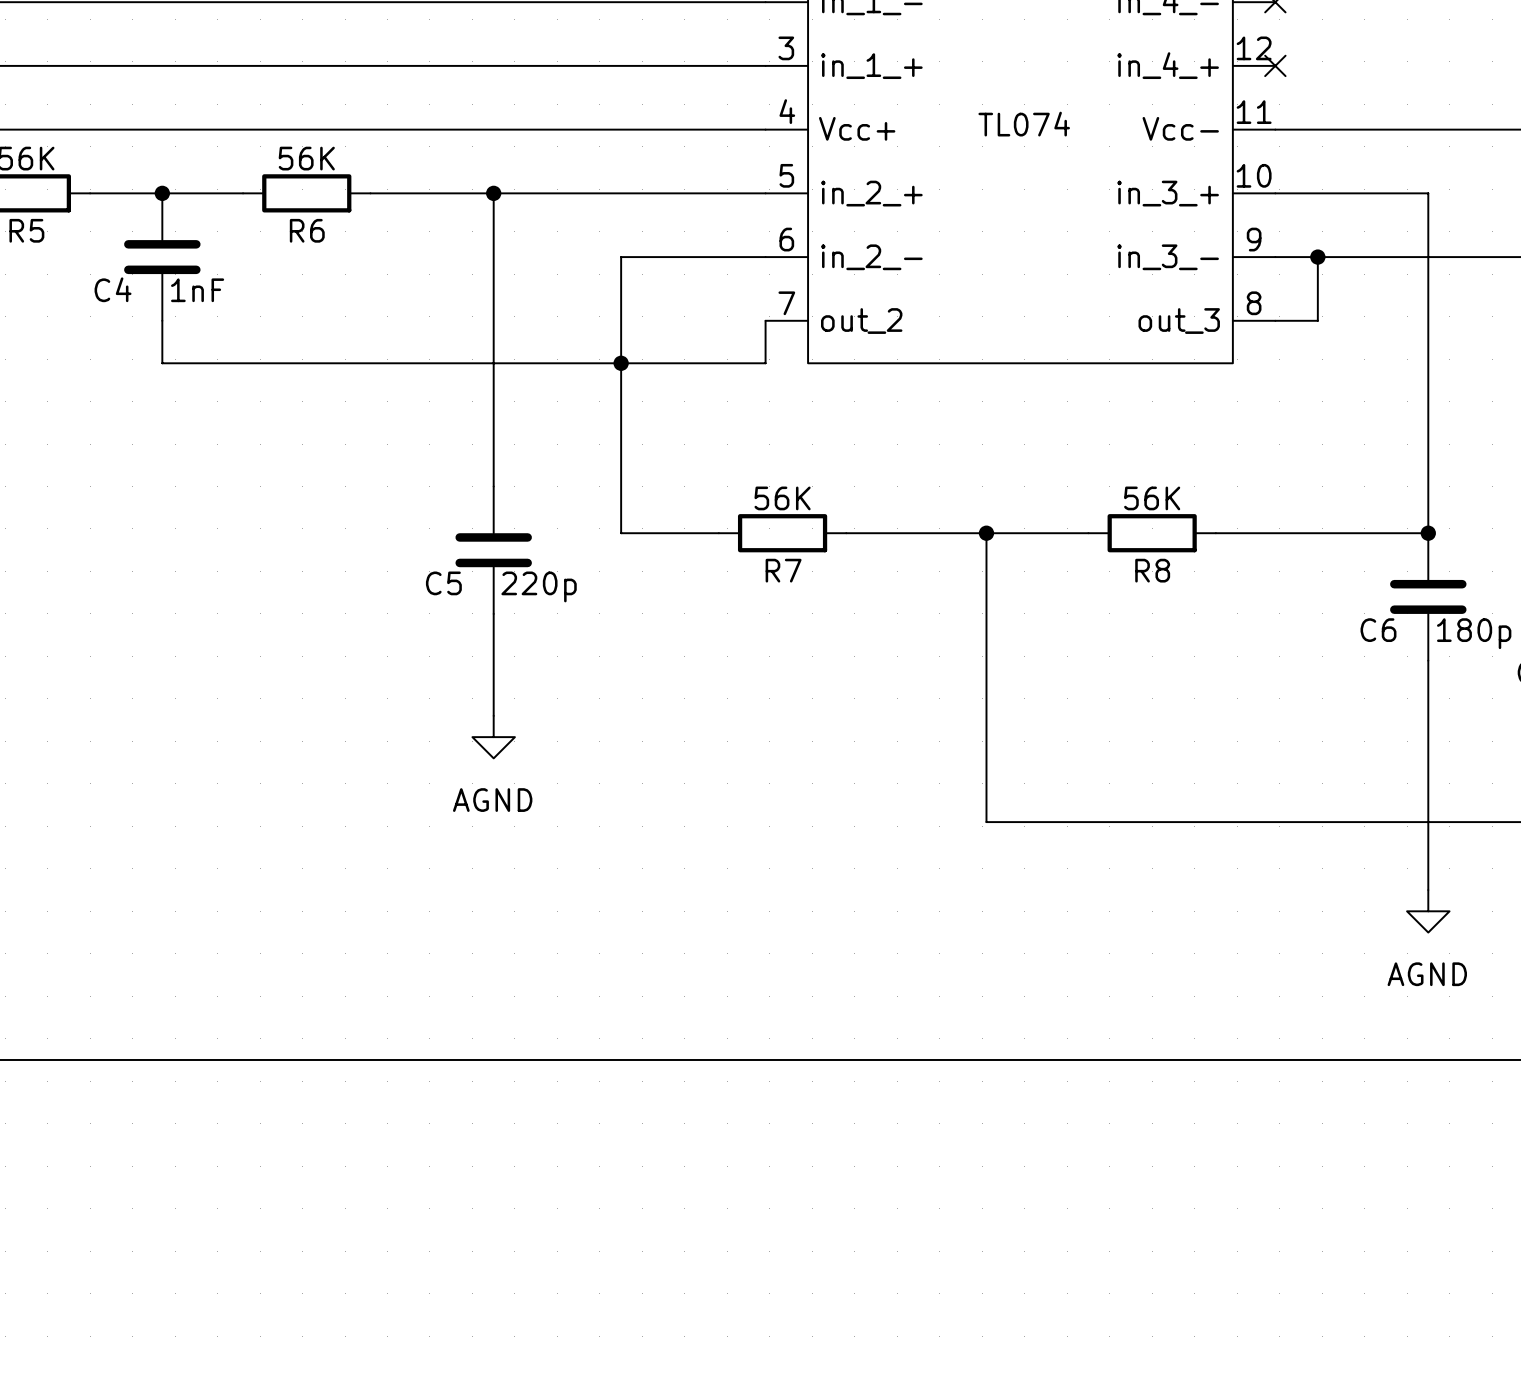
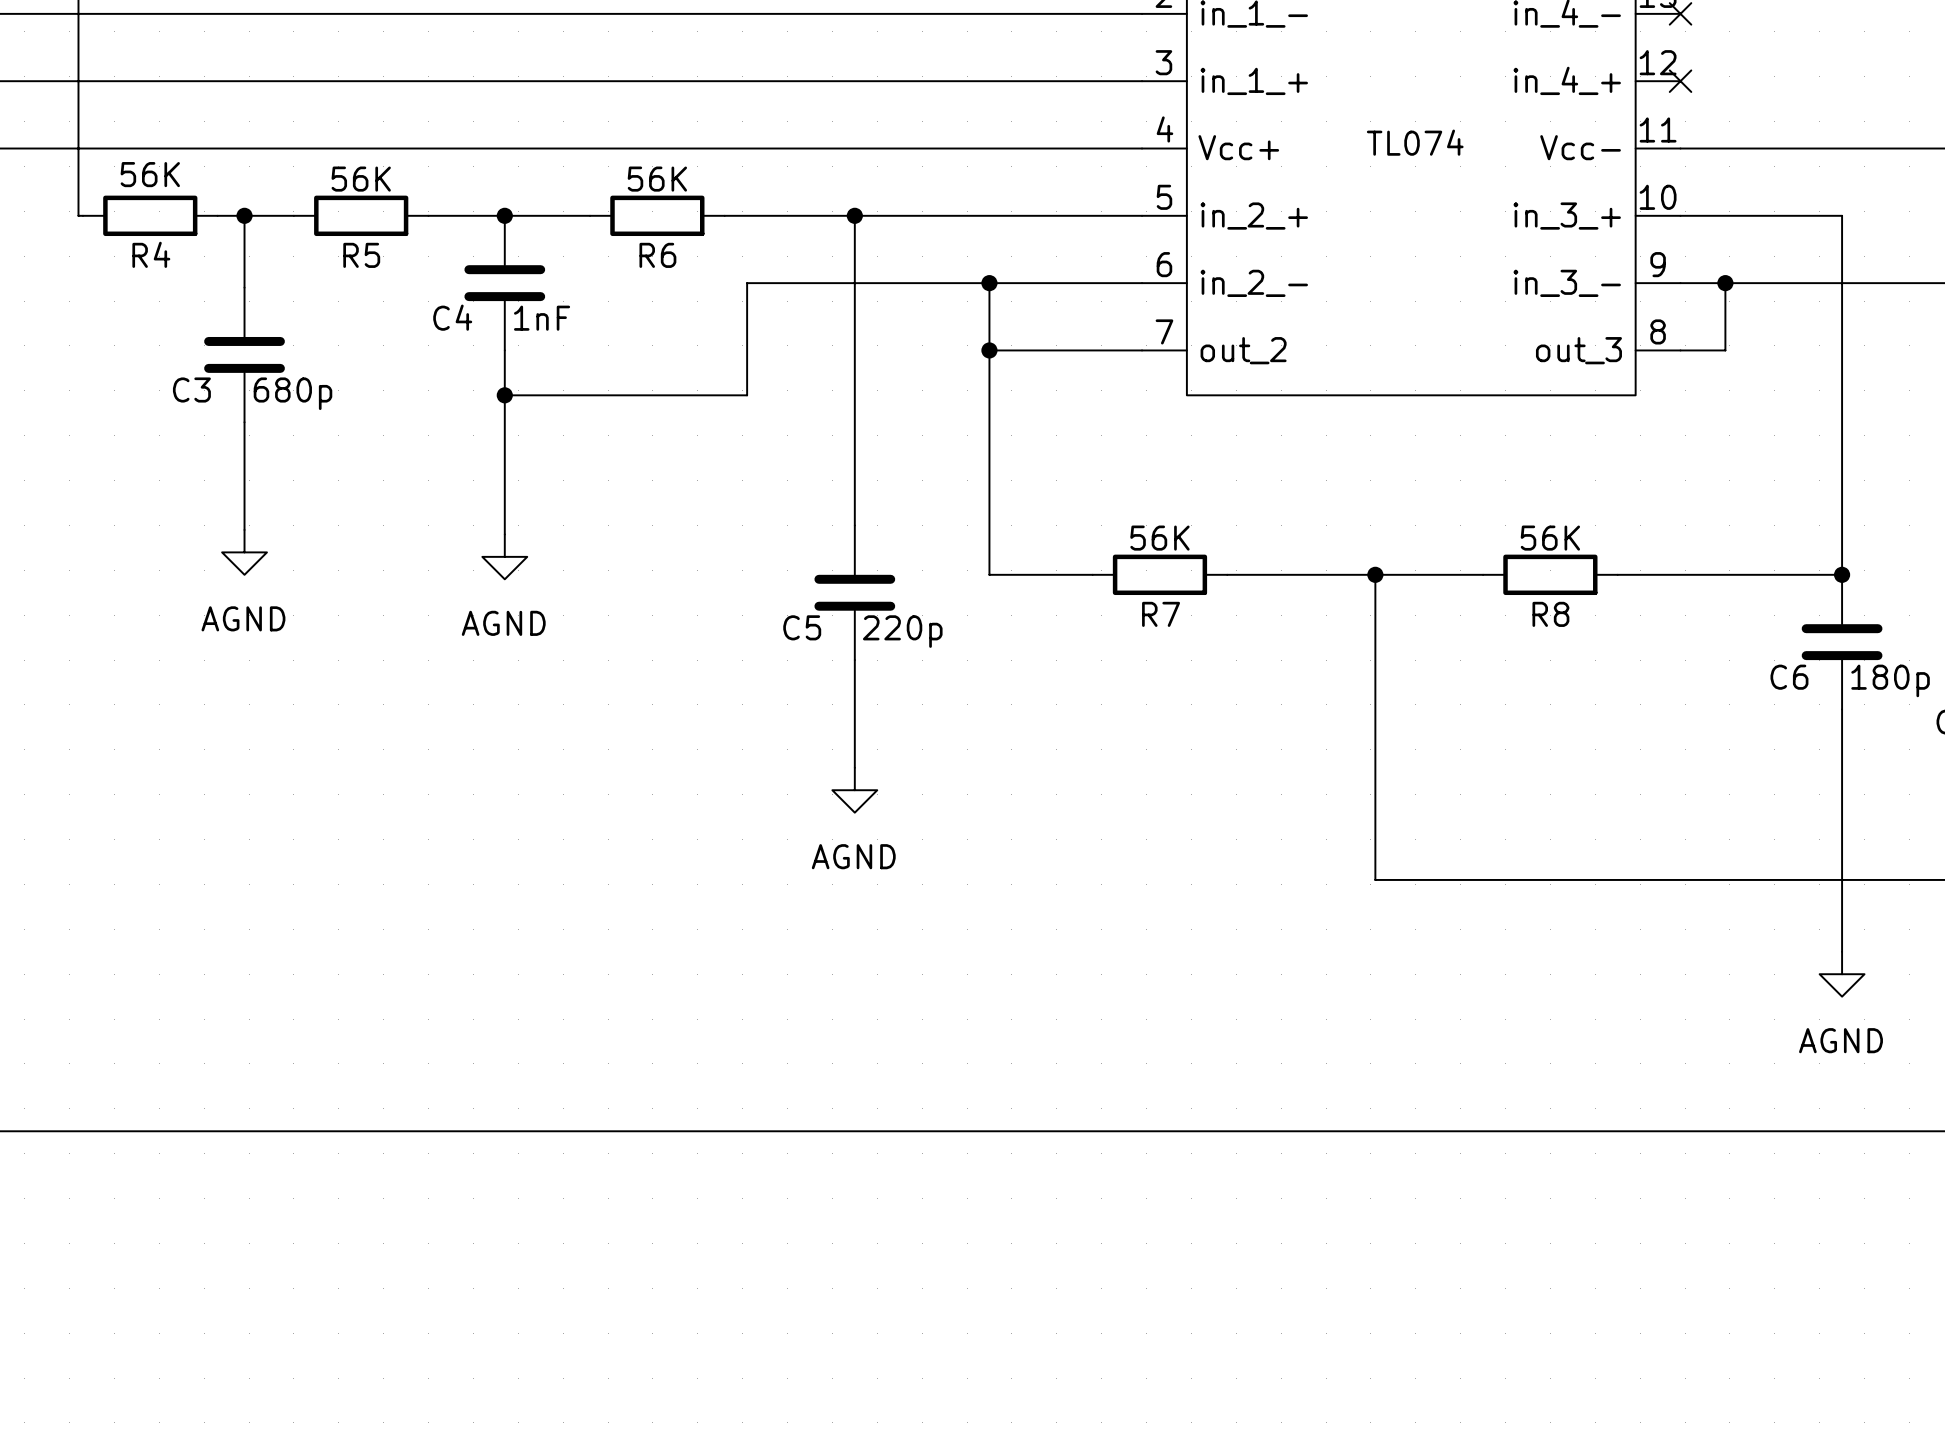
junction: none -> (989, 283)
wire: none -> (989, 350) (1142, 350)
wire: (765, 320) (765, 363) (391, 363) -> (989, 283) (747, 283) (747, 395)
wire: none -> (504, 395) (504, 534)
junction: none -> (504, 395)
junction position: (621, 363) -> (989, 350)
power symbol: none -> AGND (504, 556)

